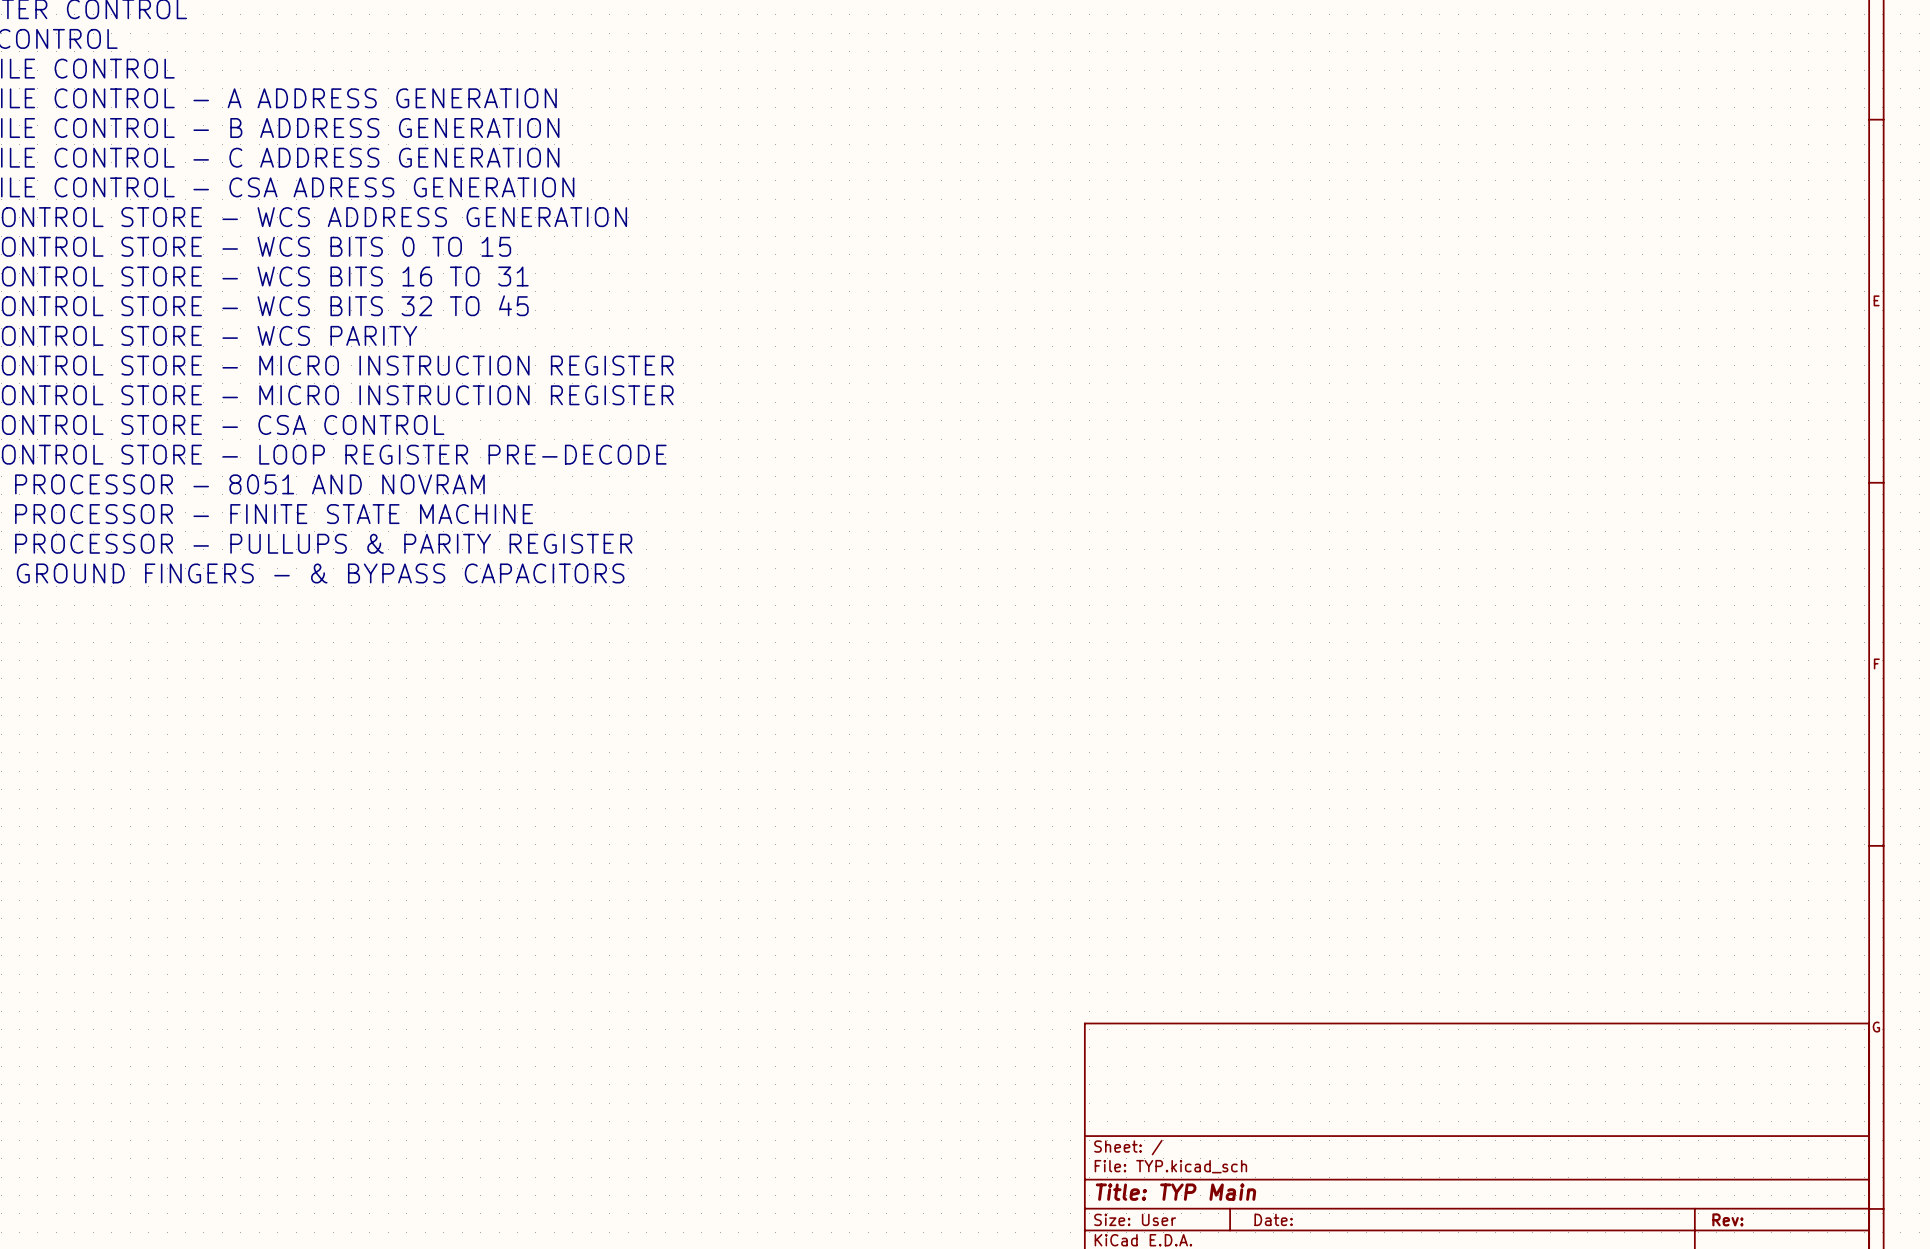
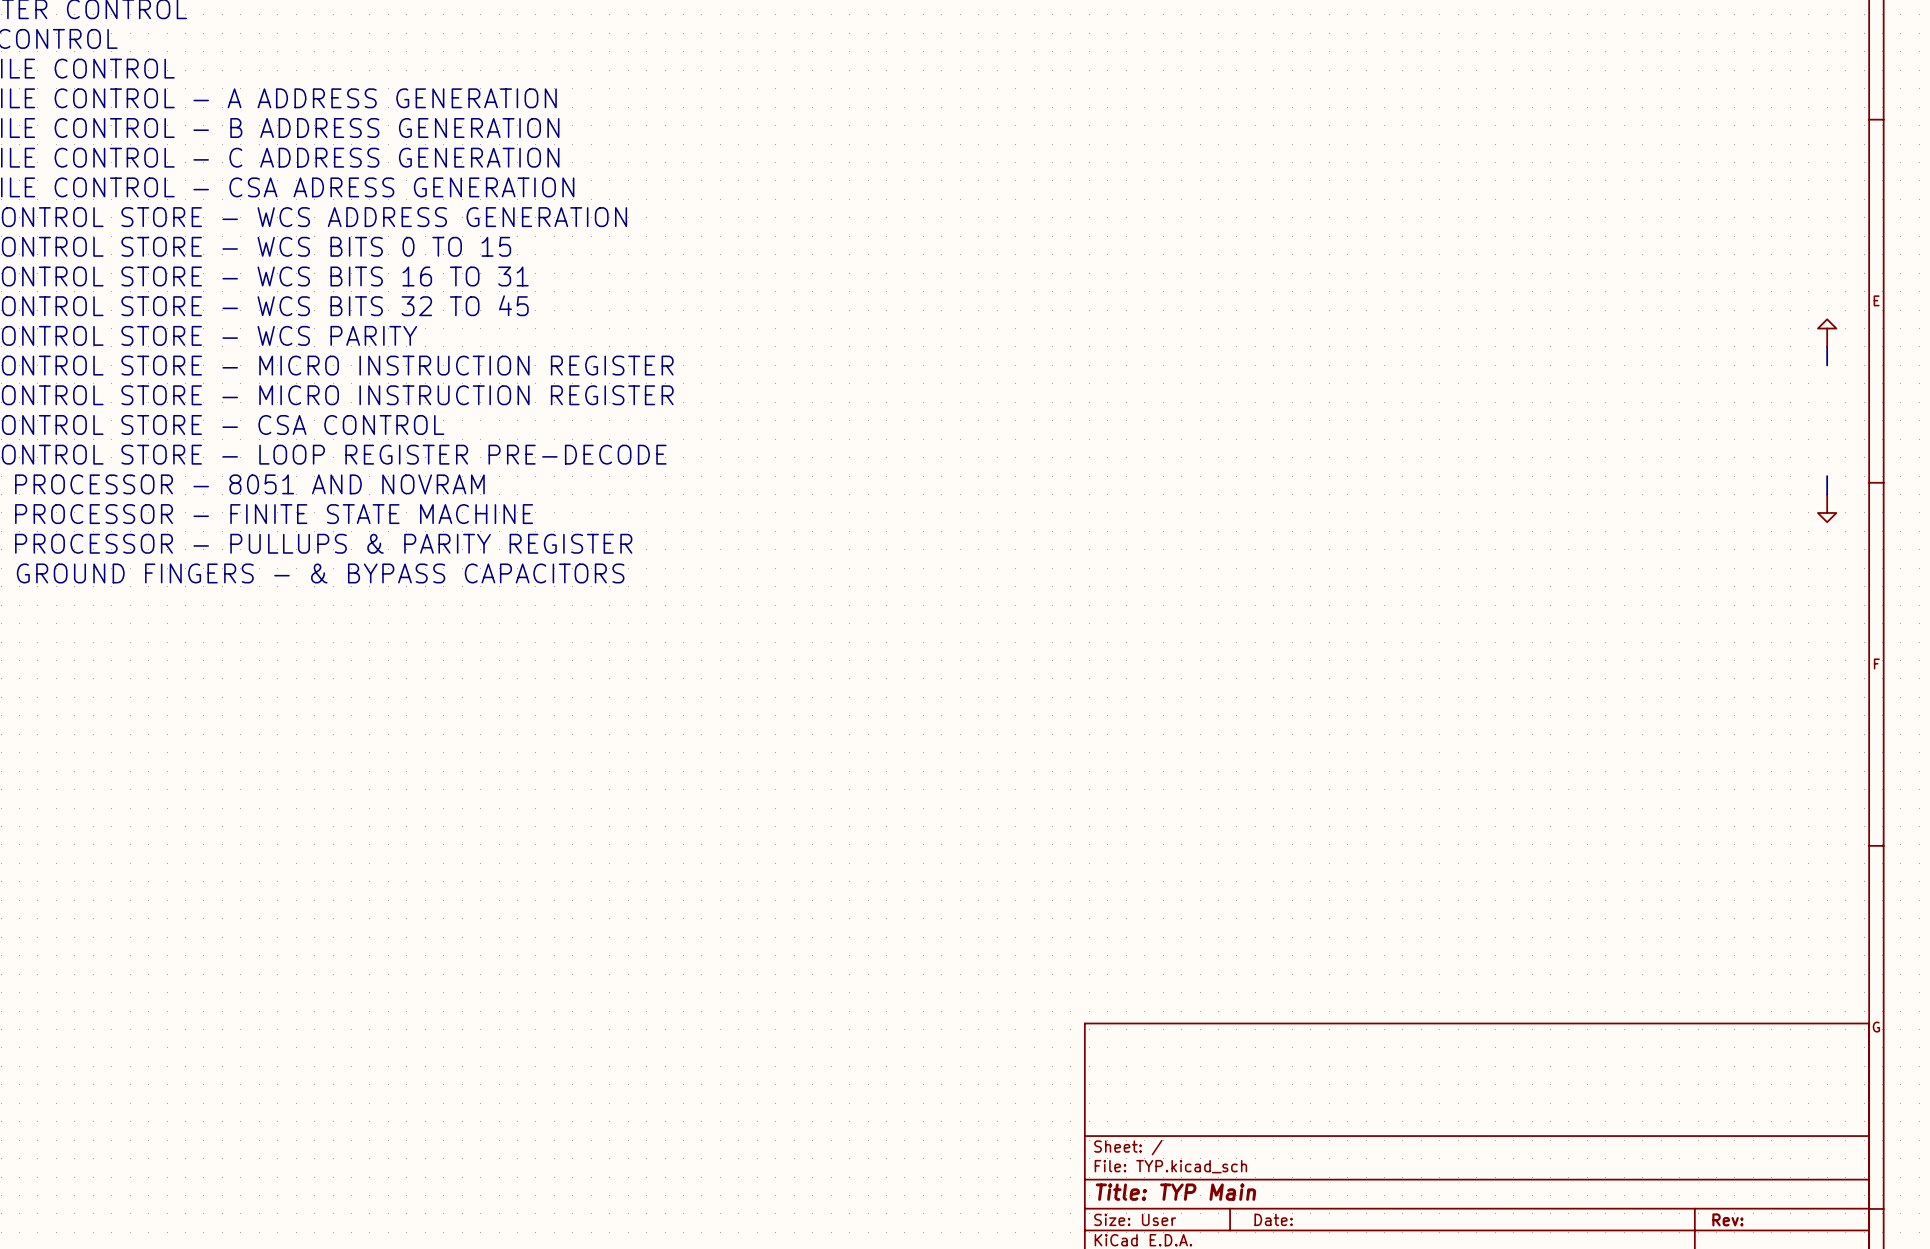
power symbol: none -> (1827, 332)
wire: none -> (1827, 346) (1827, 365)
wire: none -> (1827, 476) (1827, 494)
power symbol: none -> (1827, 508)

